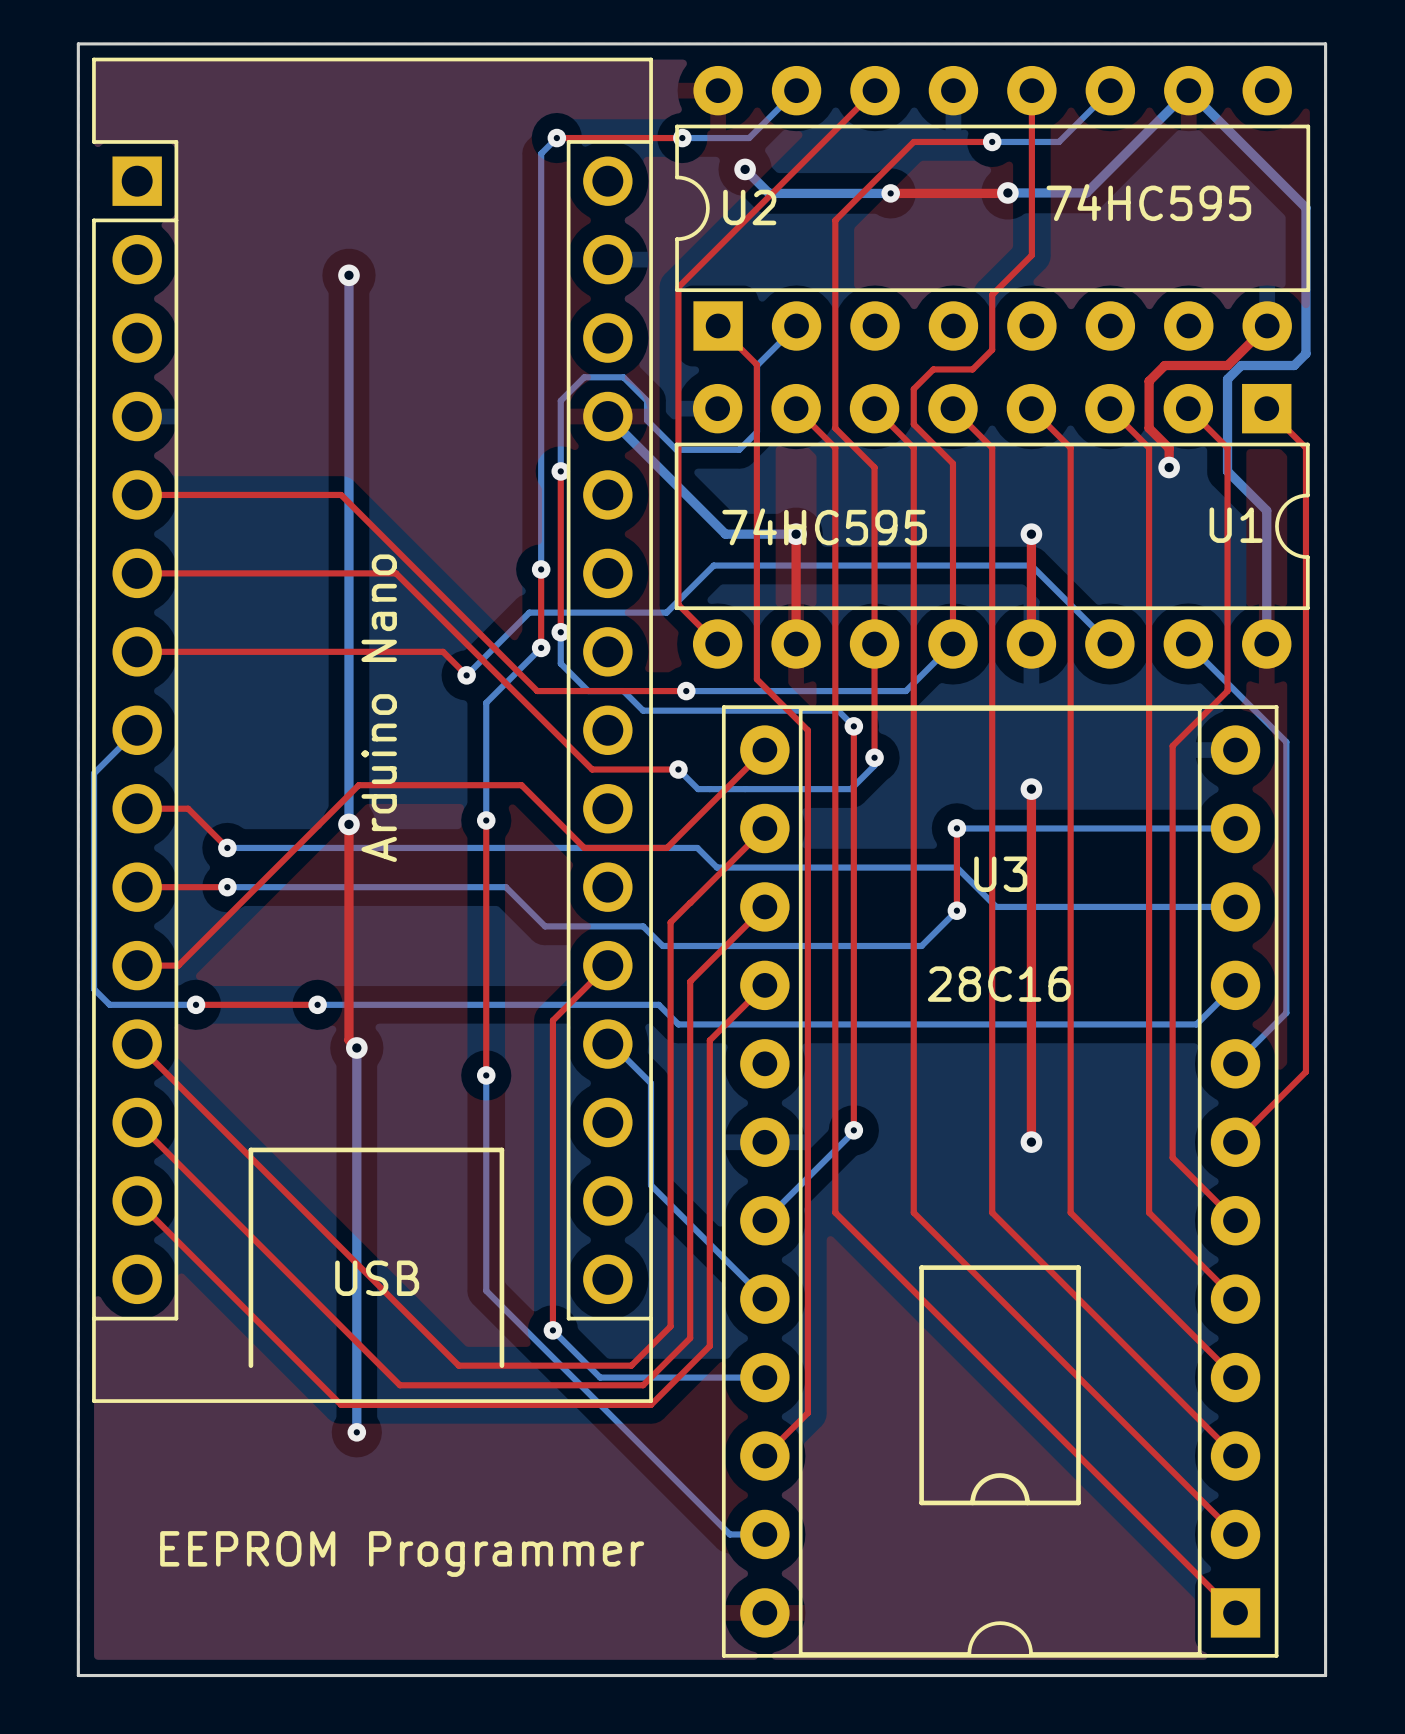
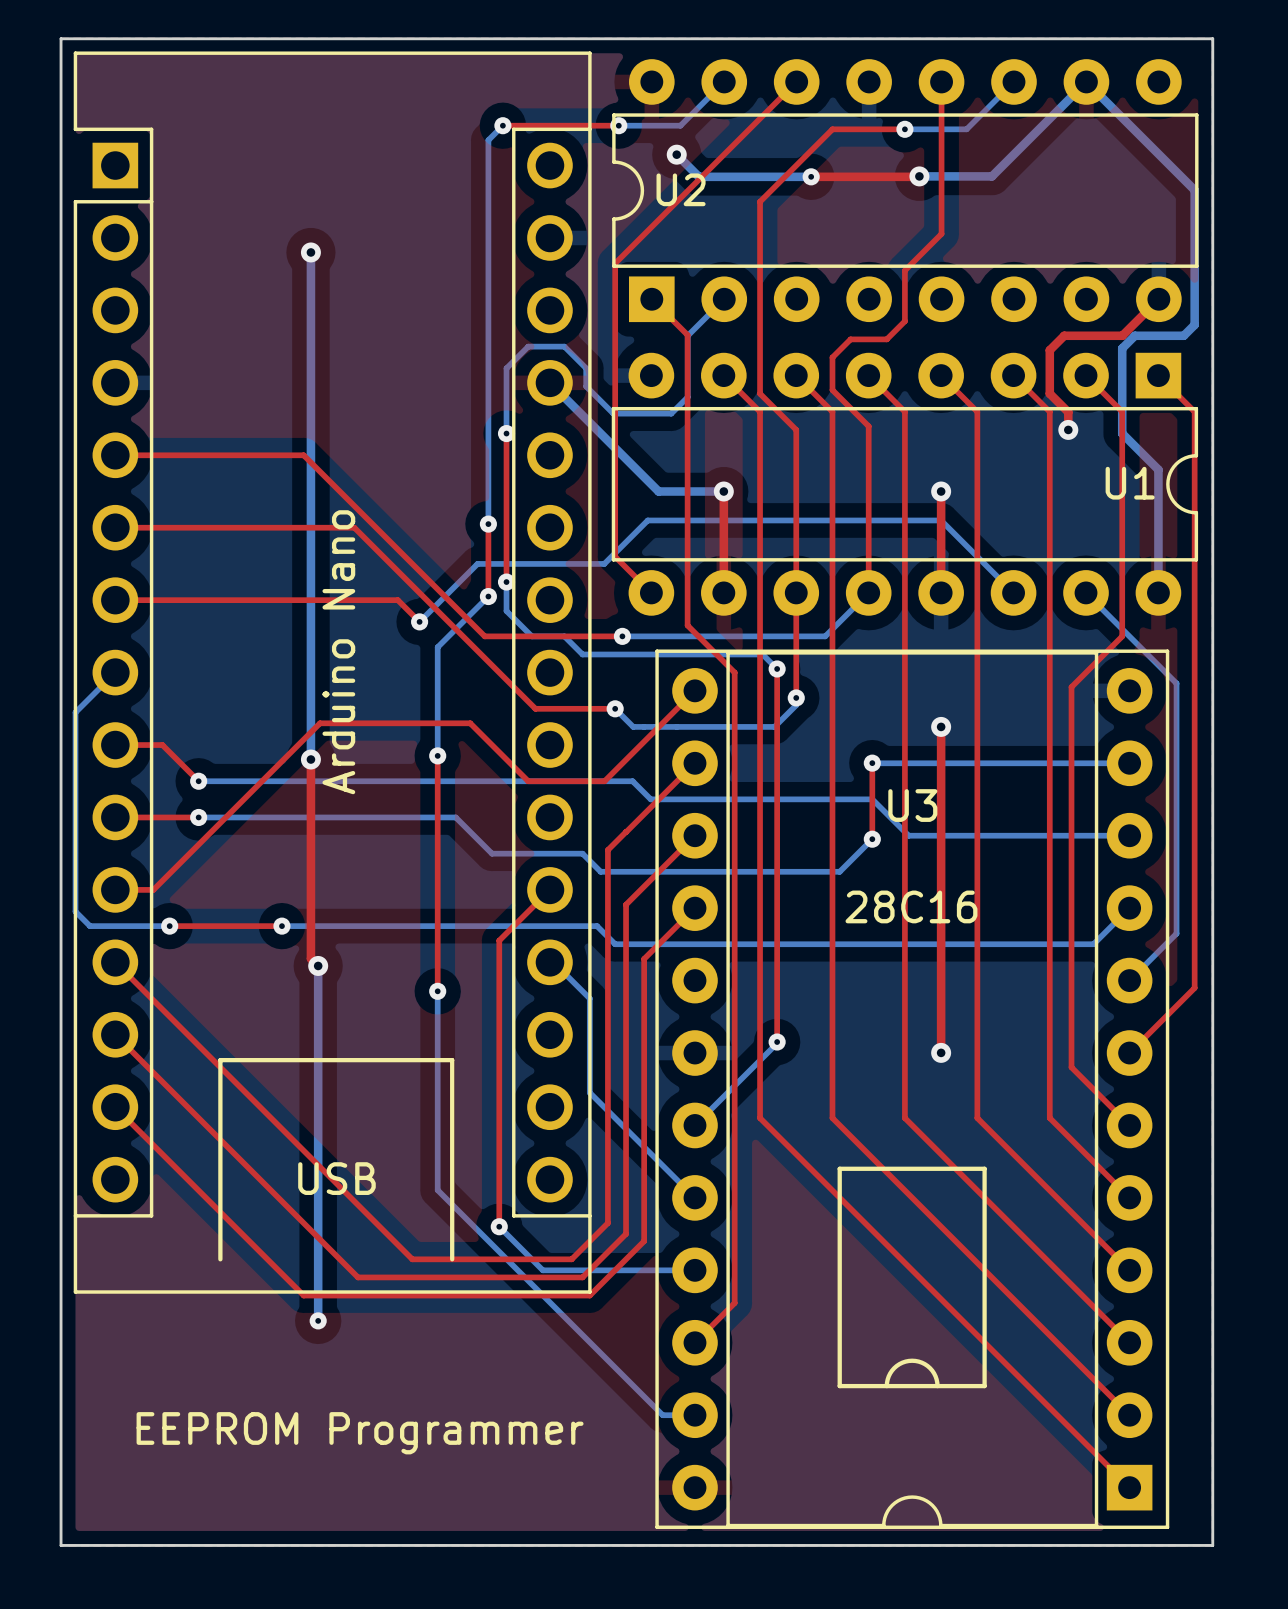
text: 74HC595 (1148, 202) -> none
text: 74HC595 (824, 526) -> none

